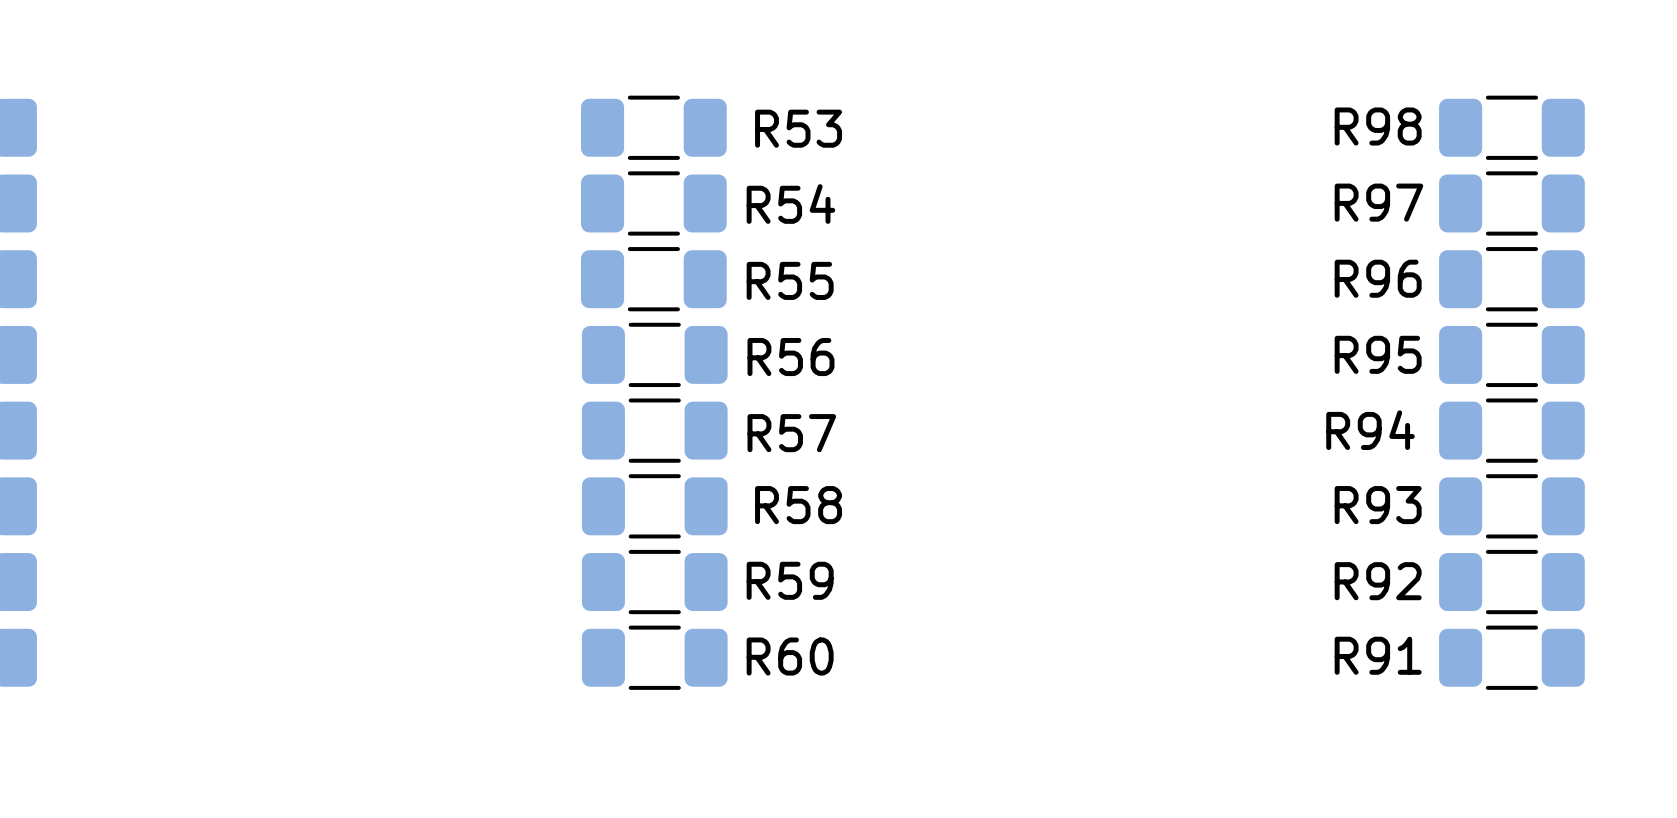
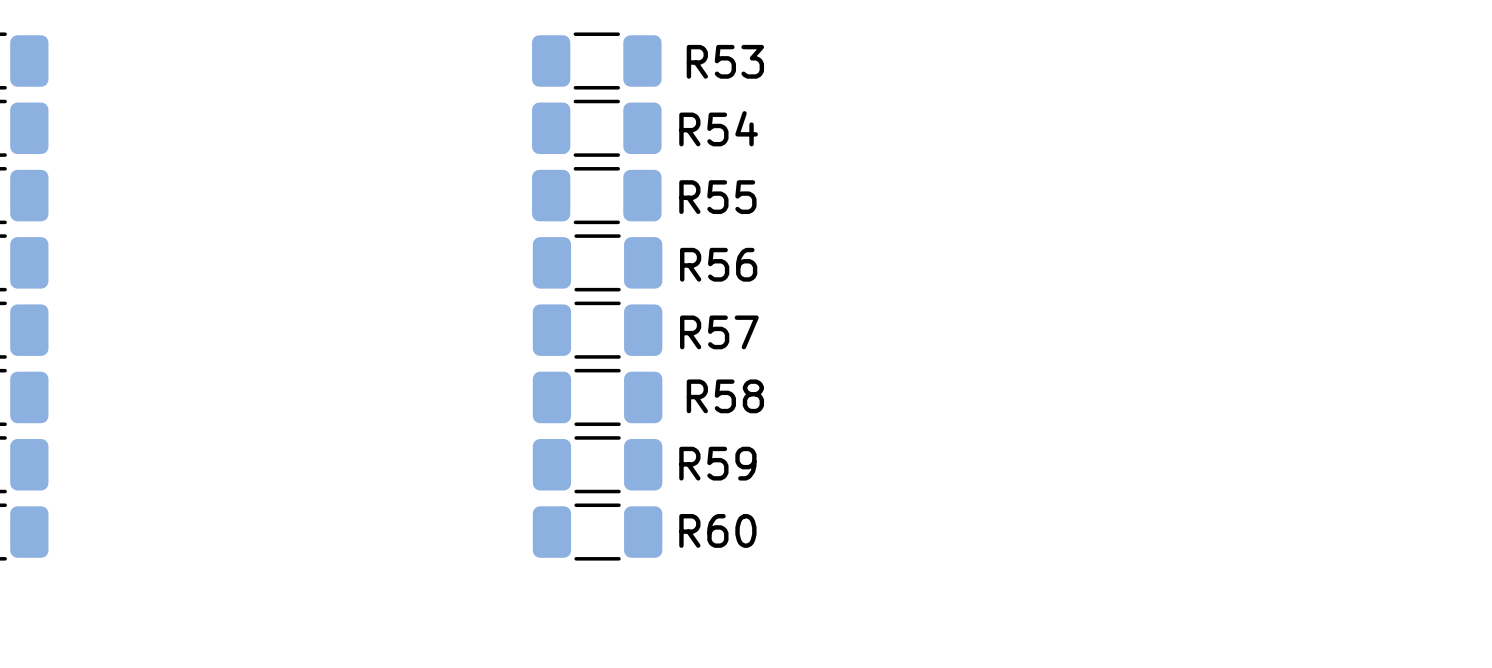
R98: (1511, 127) -> none
R97: (1511, 203) -> none
R96: (1511, 279) -> none
R95: (1511, 354) -> none
R94: (1511, 430) -> none
R93: (1511, 506) -> none
R92: (1511, 582) -> none
R91: (1511, 657) -> none

